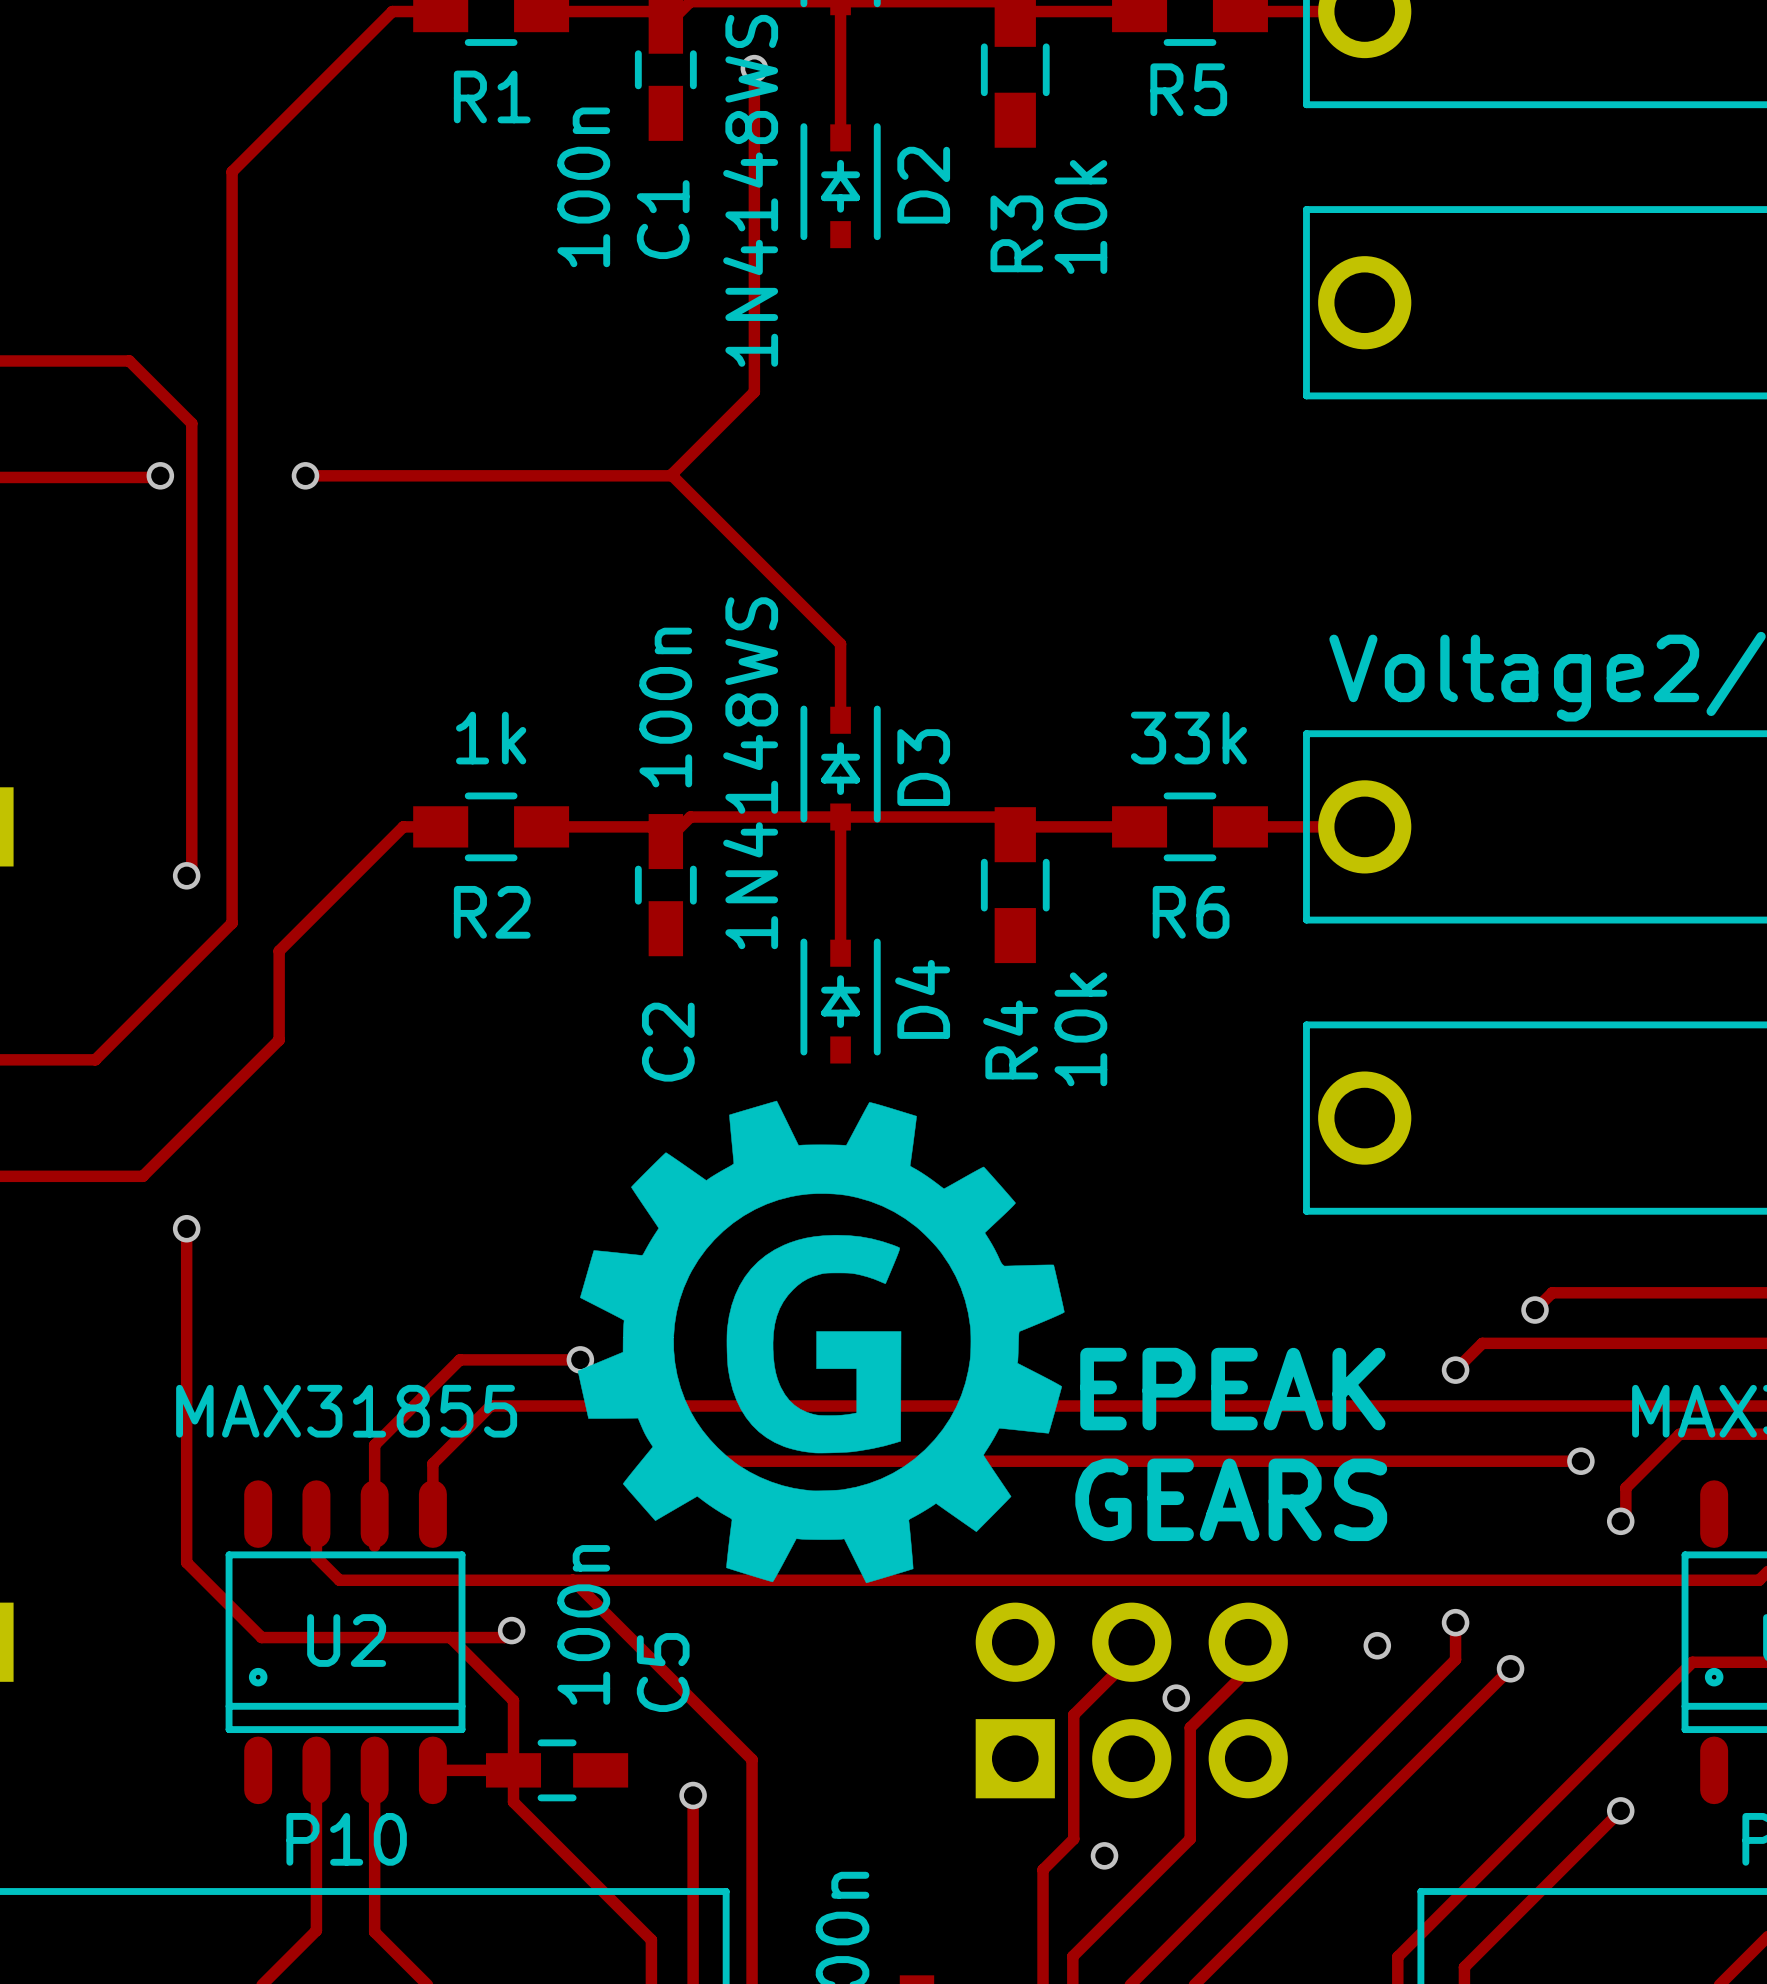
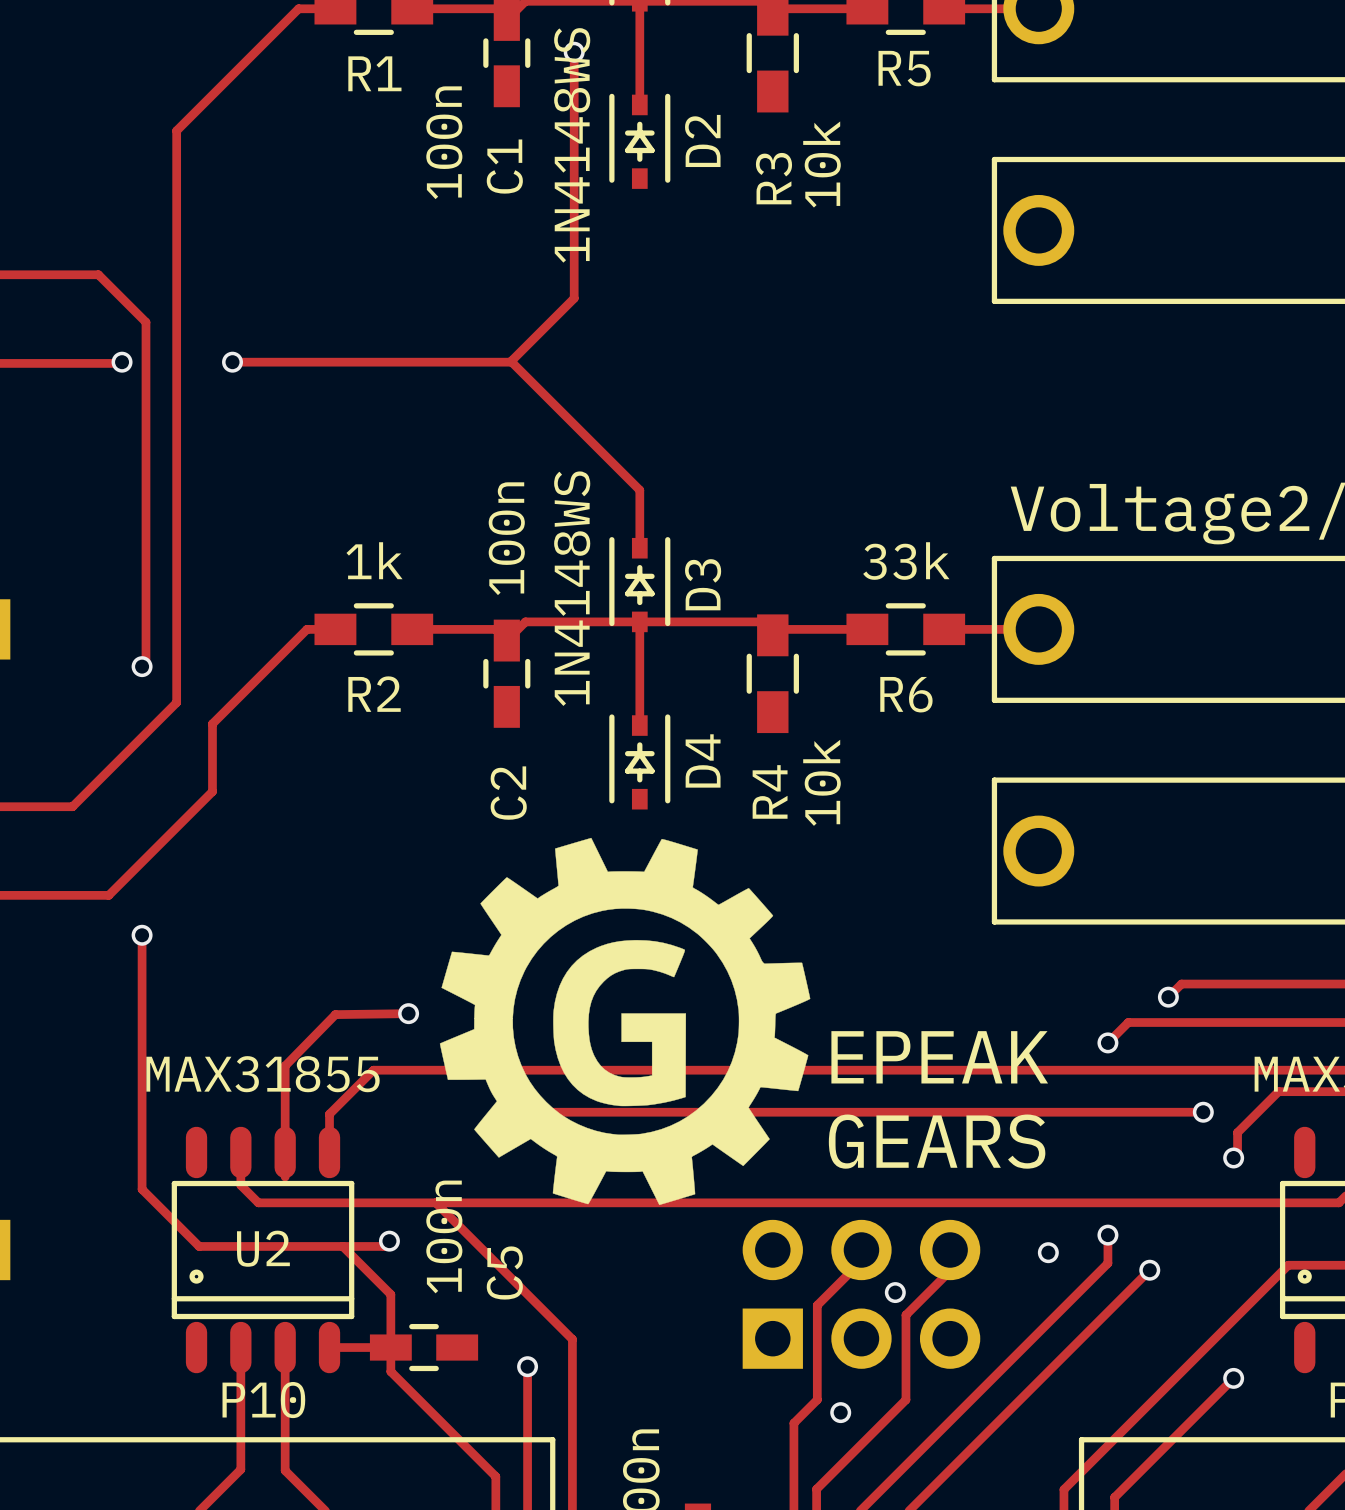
track: (580, 1359) (459, 1359) (374, 1445) -> (408, 1013) (335, 1014) (285, 1065) (285, 1100)
via position: (580, 1359) -> (408, 1013)

